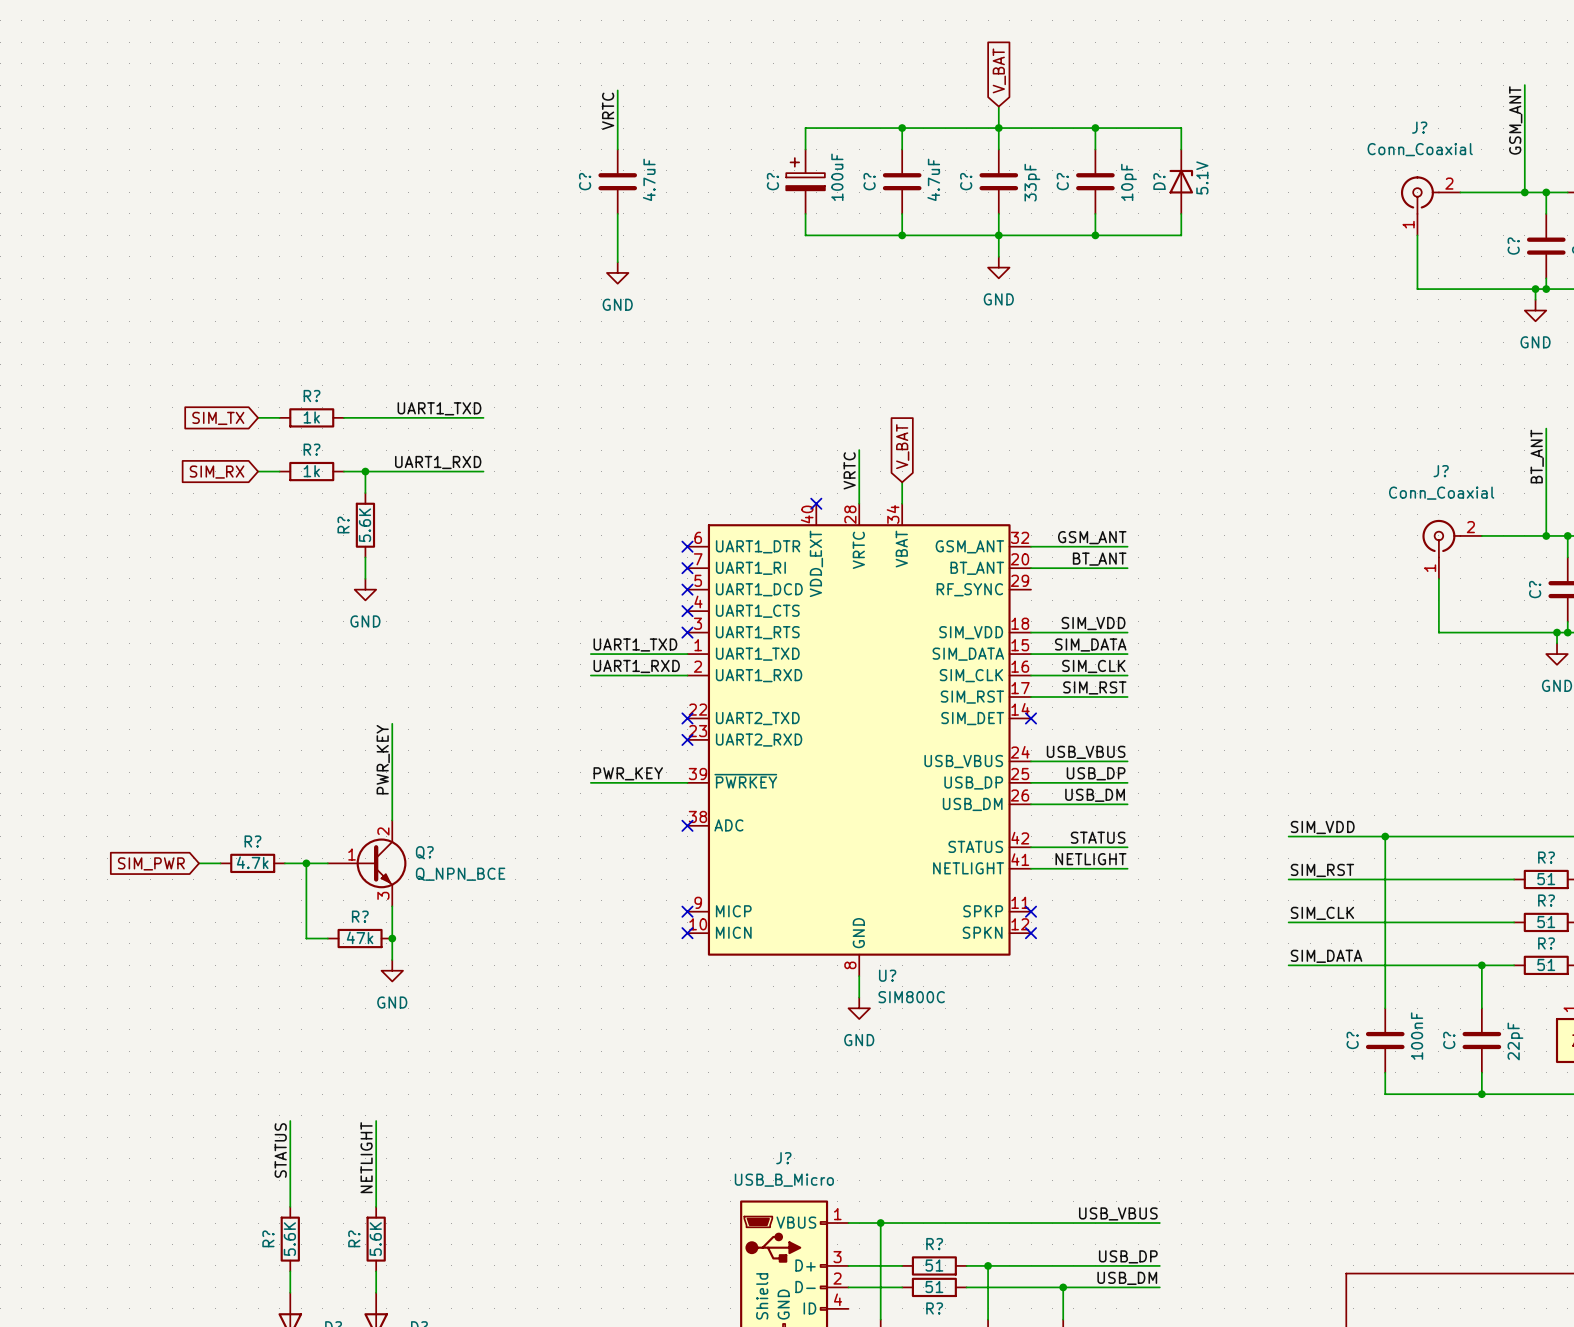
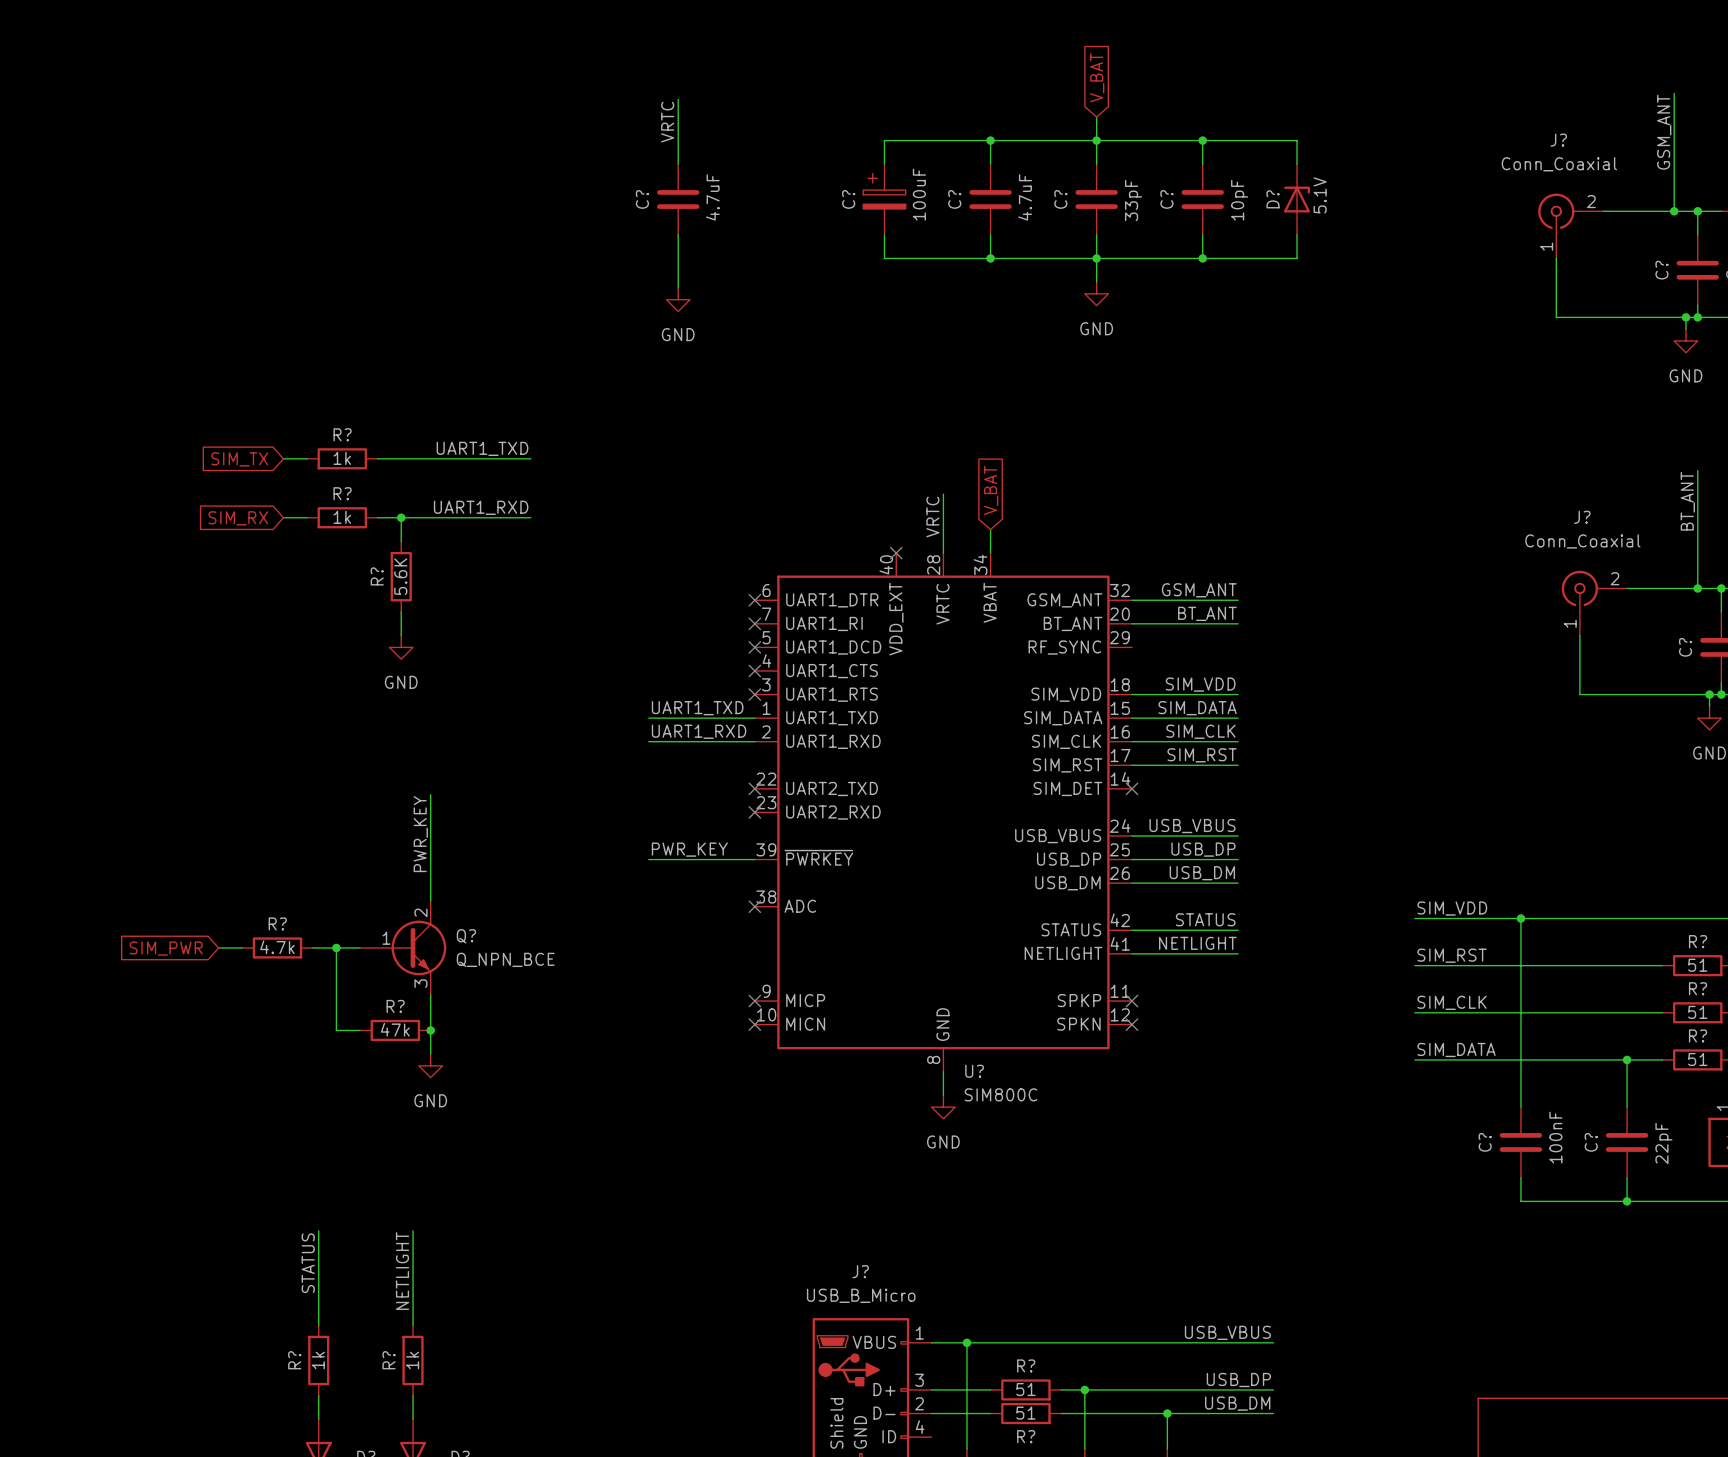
R? value: 5.6K (289, 1239) -> 1k (318, 1360)
R? value: 5.6K (375, 1239) -> 1k (412, 1360)

